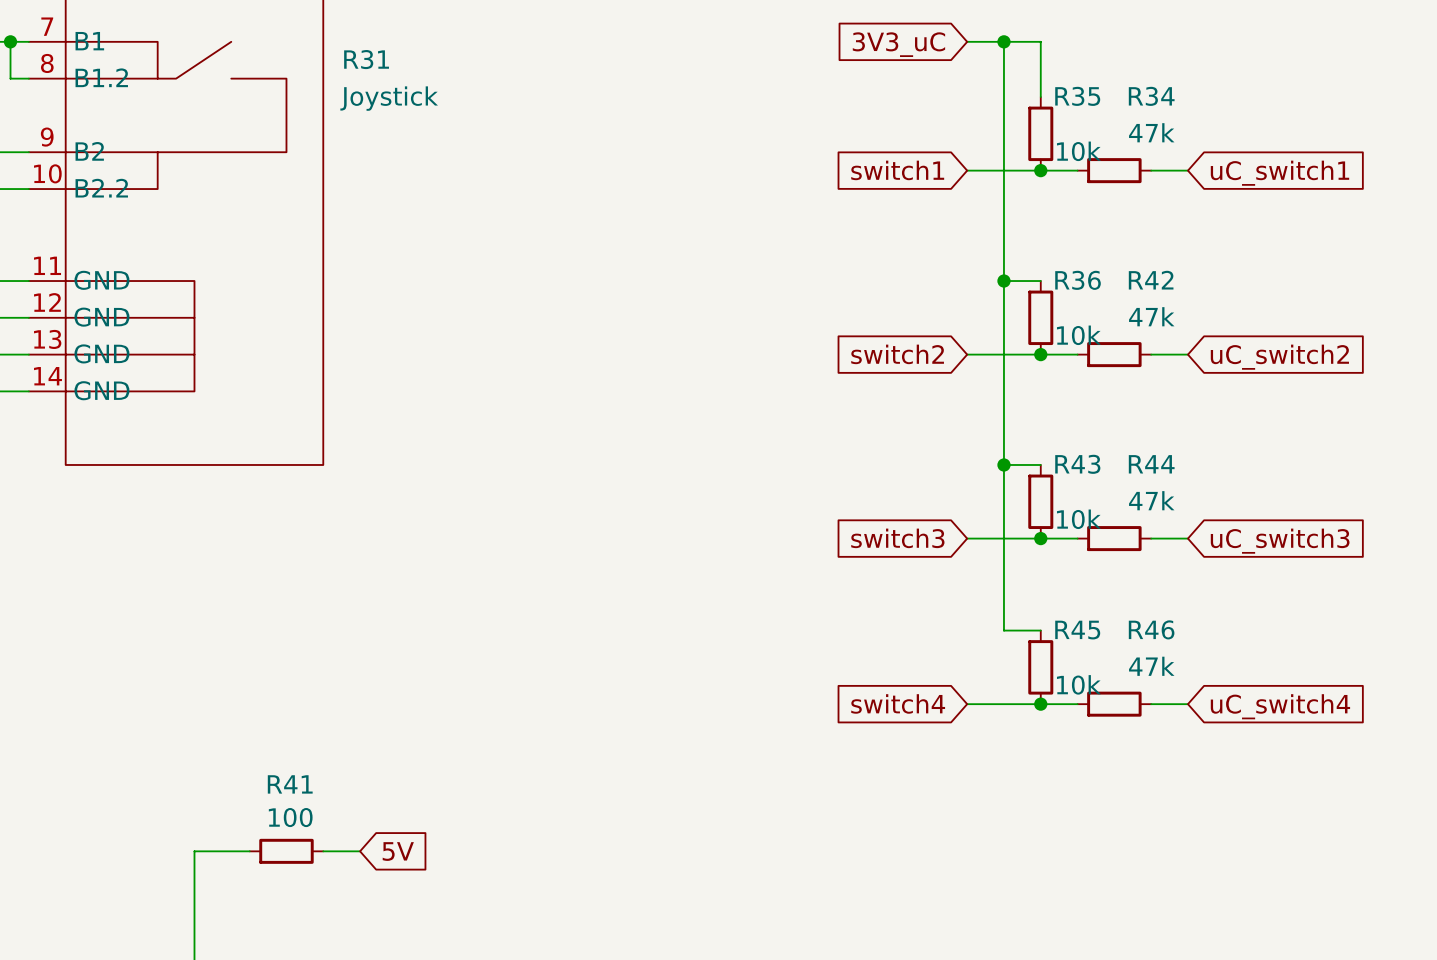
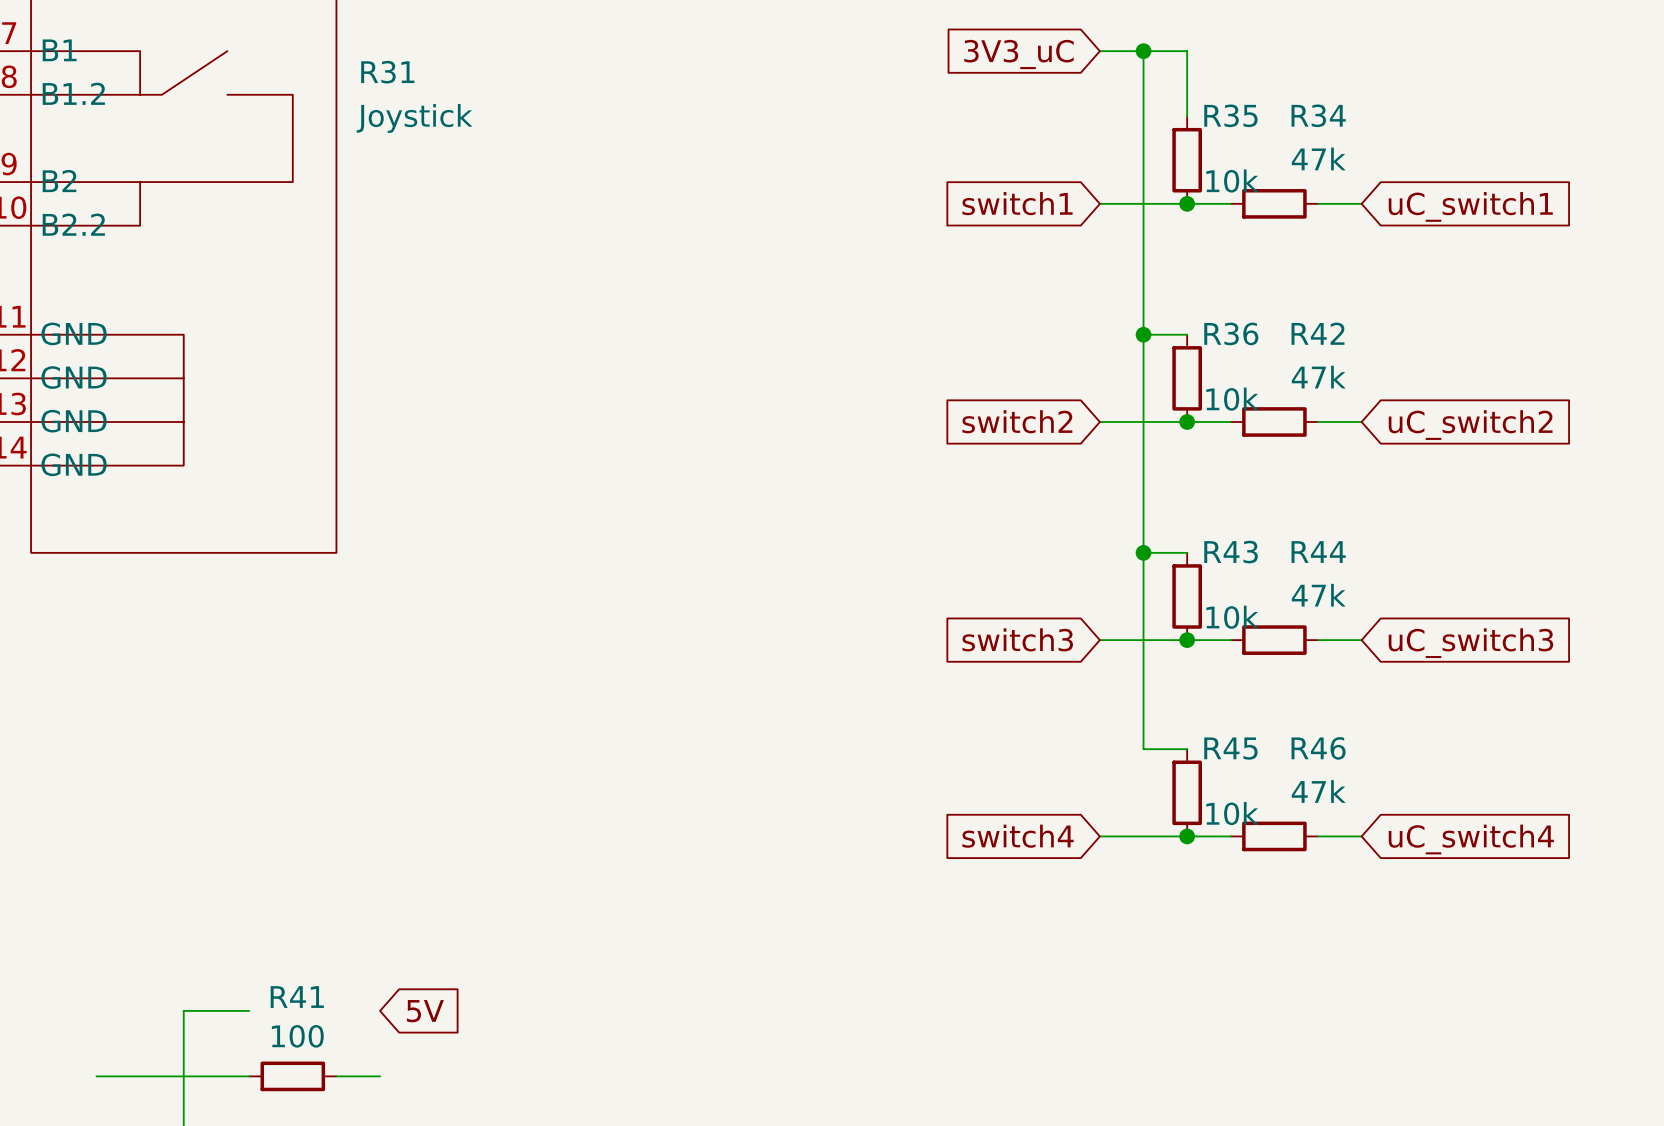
R41 position: (286, 851) -> (292, 1076)
wire: (323, 851) (360, 851) -> (336, 1076) (380, 1076)
wire: none -> (96, 1076) (249, 1076)

